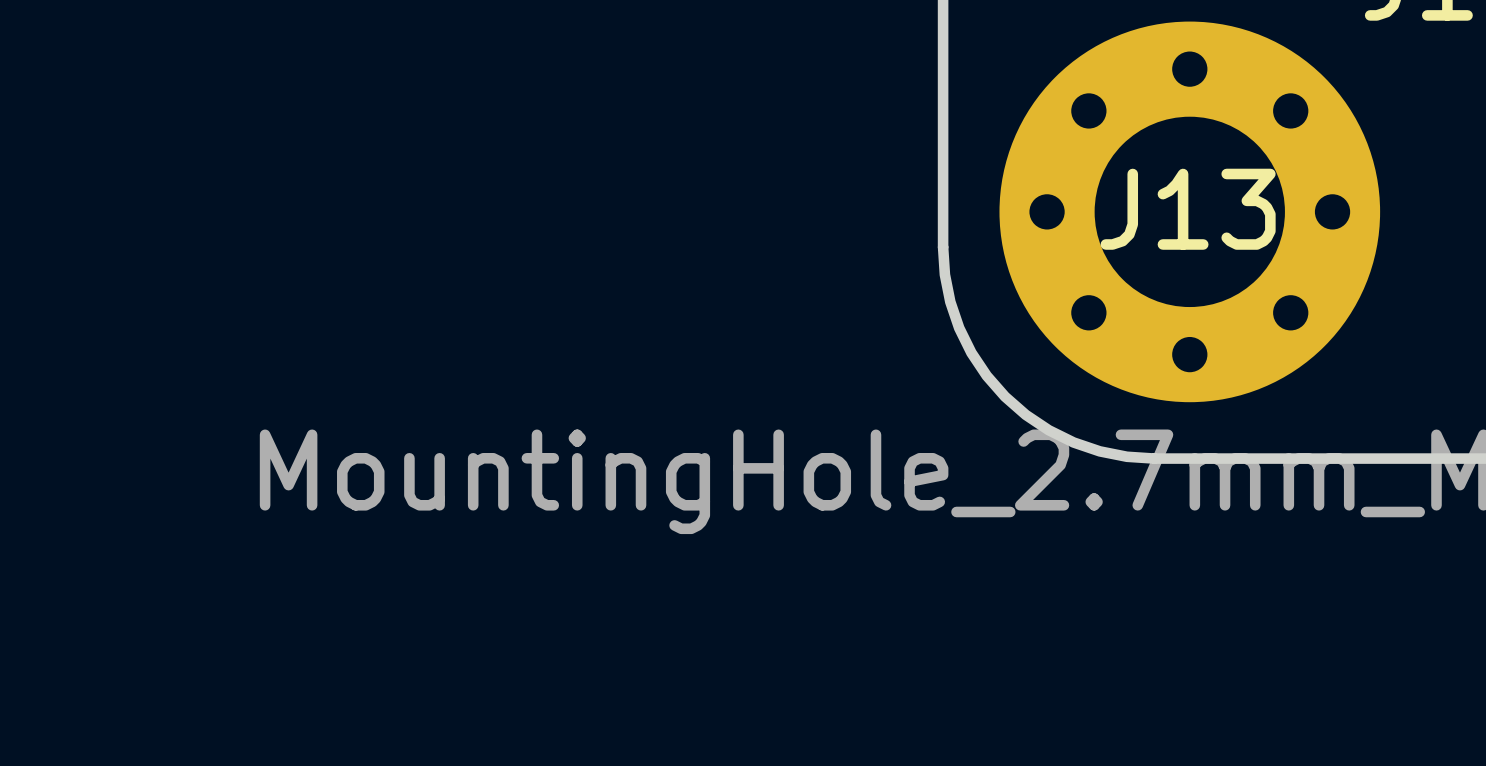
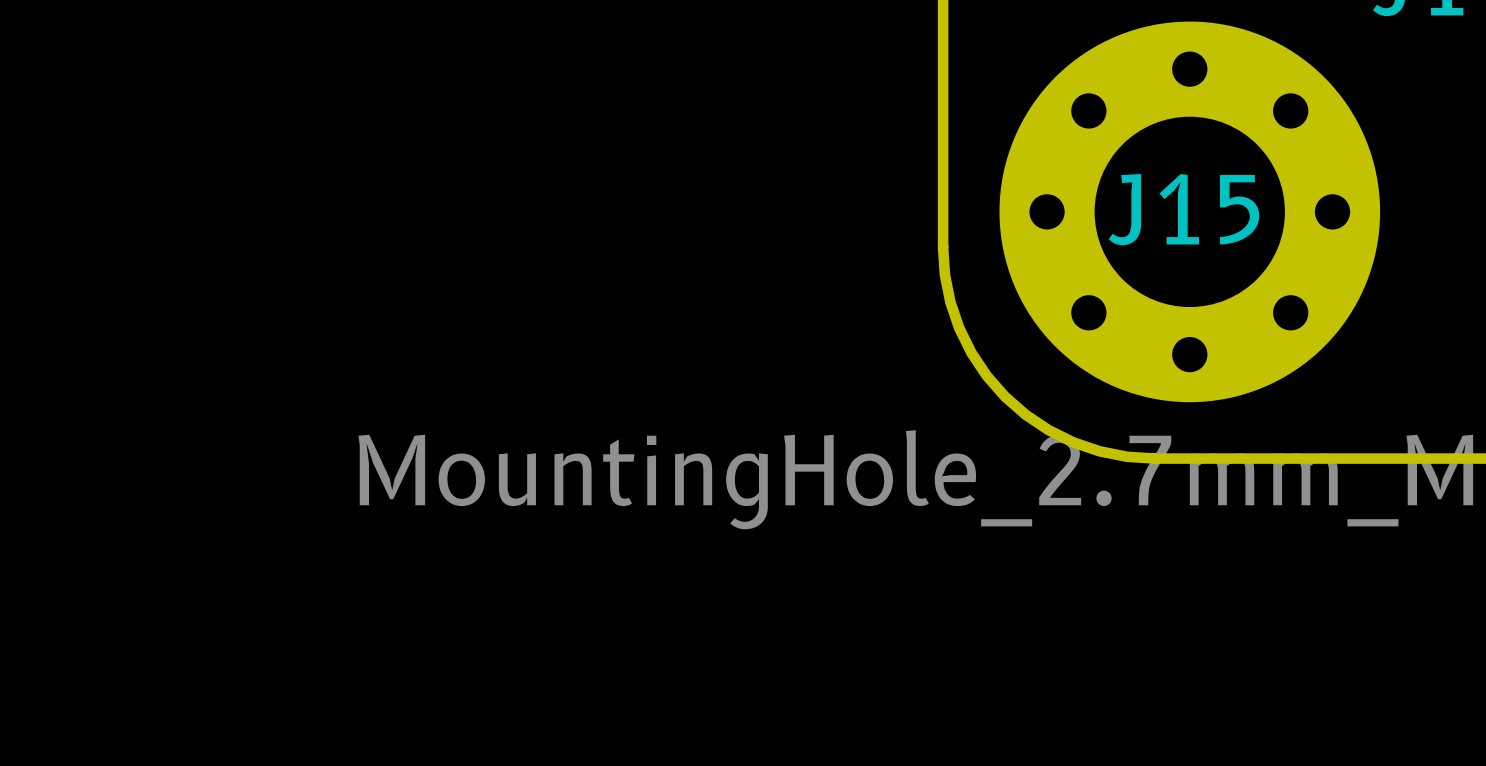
J13 name: J13 (1188, 209) -> J15 (1183, 209)

